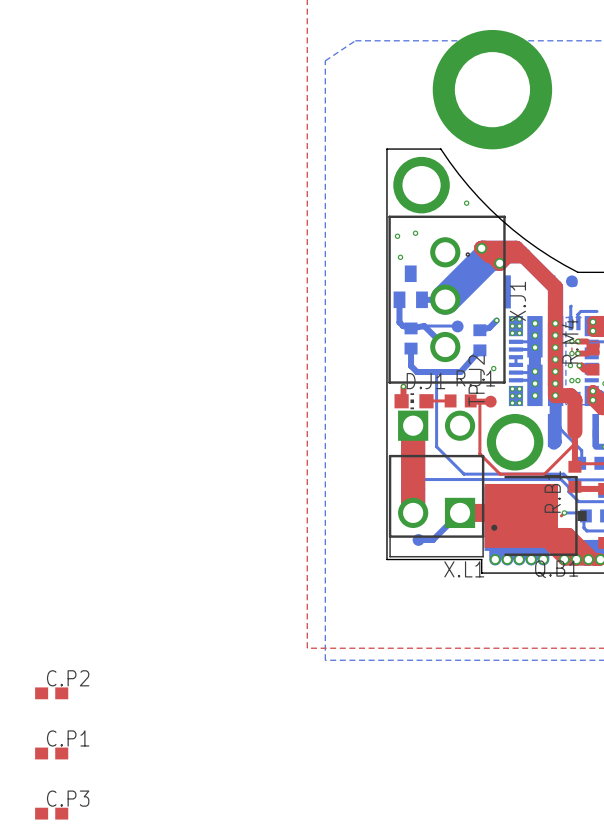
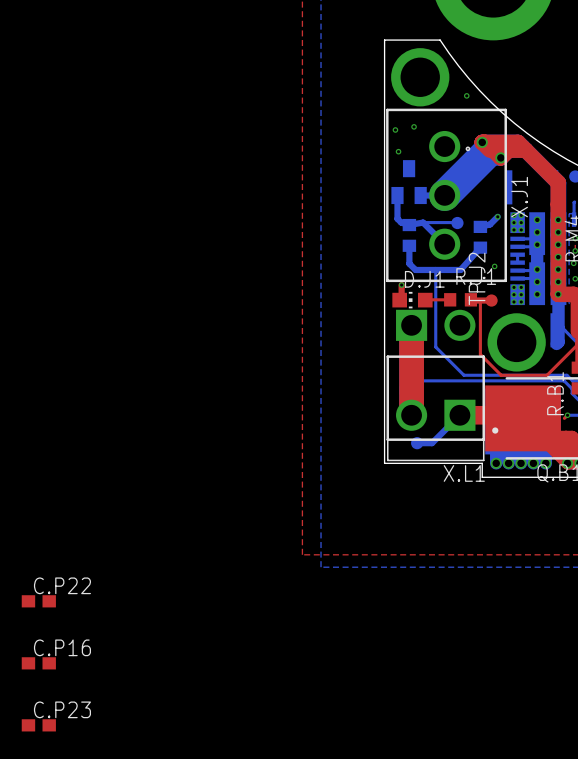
C.P2 name: C.P2 (68, 678) -> C.P22 (62, 585)
C.P1 name: C.P1 (68, 738) -> C.P16 (62, 647)
C.P3 name: C.P3 (68, 798) -> C.P23 (62, 709)

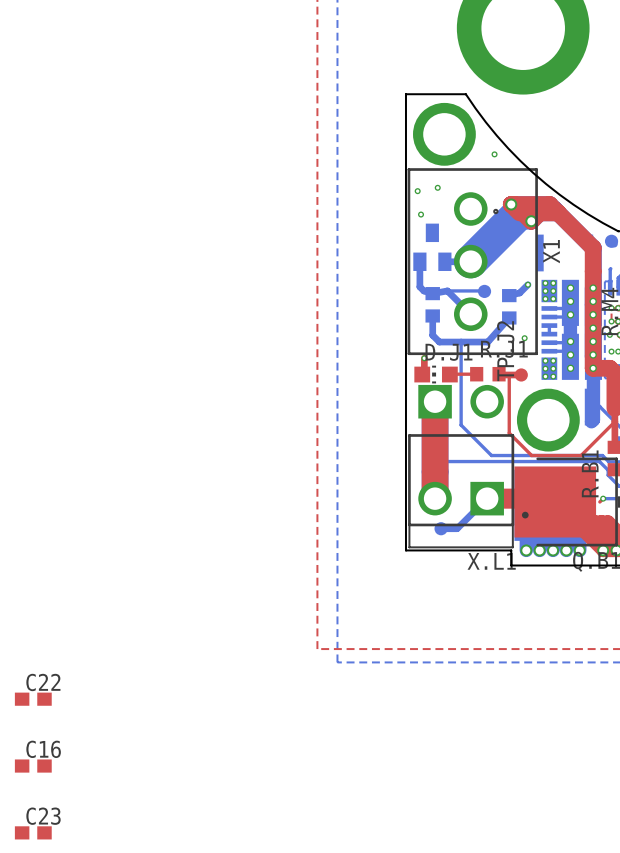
X.J1 name: X.J1 (519, 197) -> X1 (551, 251)
C.P22 name: C.P22 (62, 585) -> C22 (43, 682)
C.P16 name: C.P16 (62, 647) -> C16 (43, 749)
C.P23 name: C.P23 (62, 709) -> C23 (43, 816)

